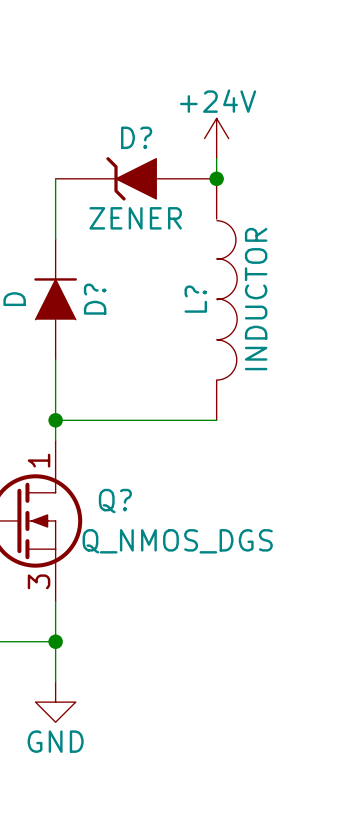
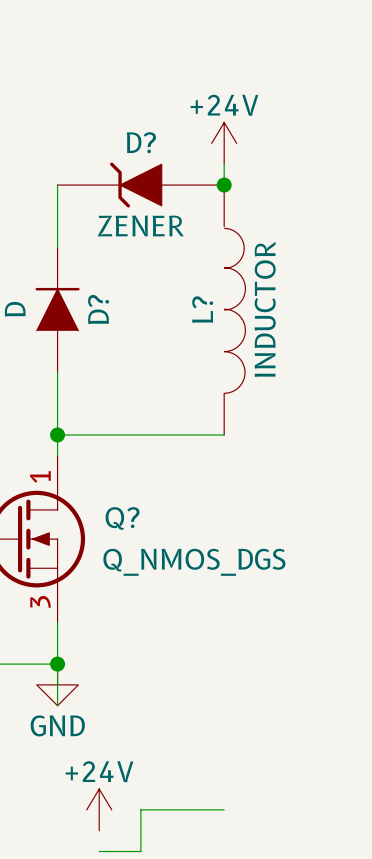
power symbol position: GND (55, 702) -> GND (57, 684)
power symbol: none -> +24V (99, 809)
wire: none -> (224, 809) (140, 809) (140, 851) (99, 851)

